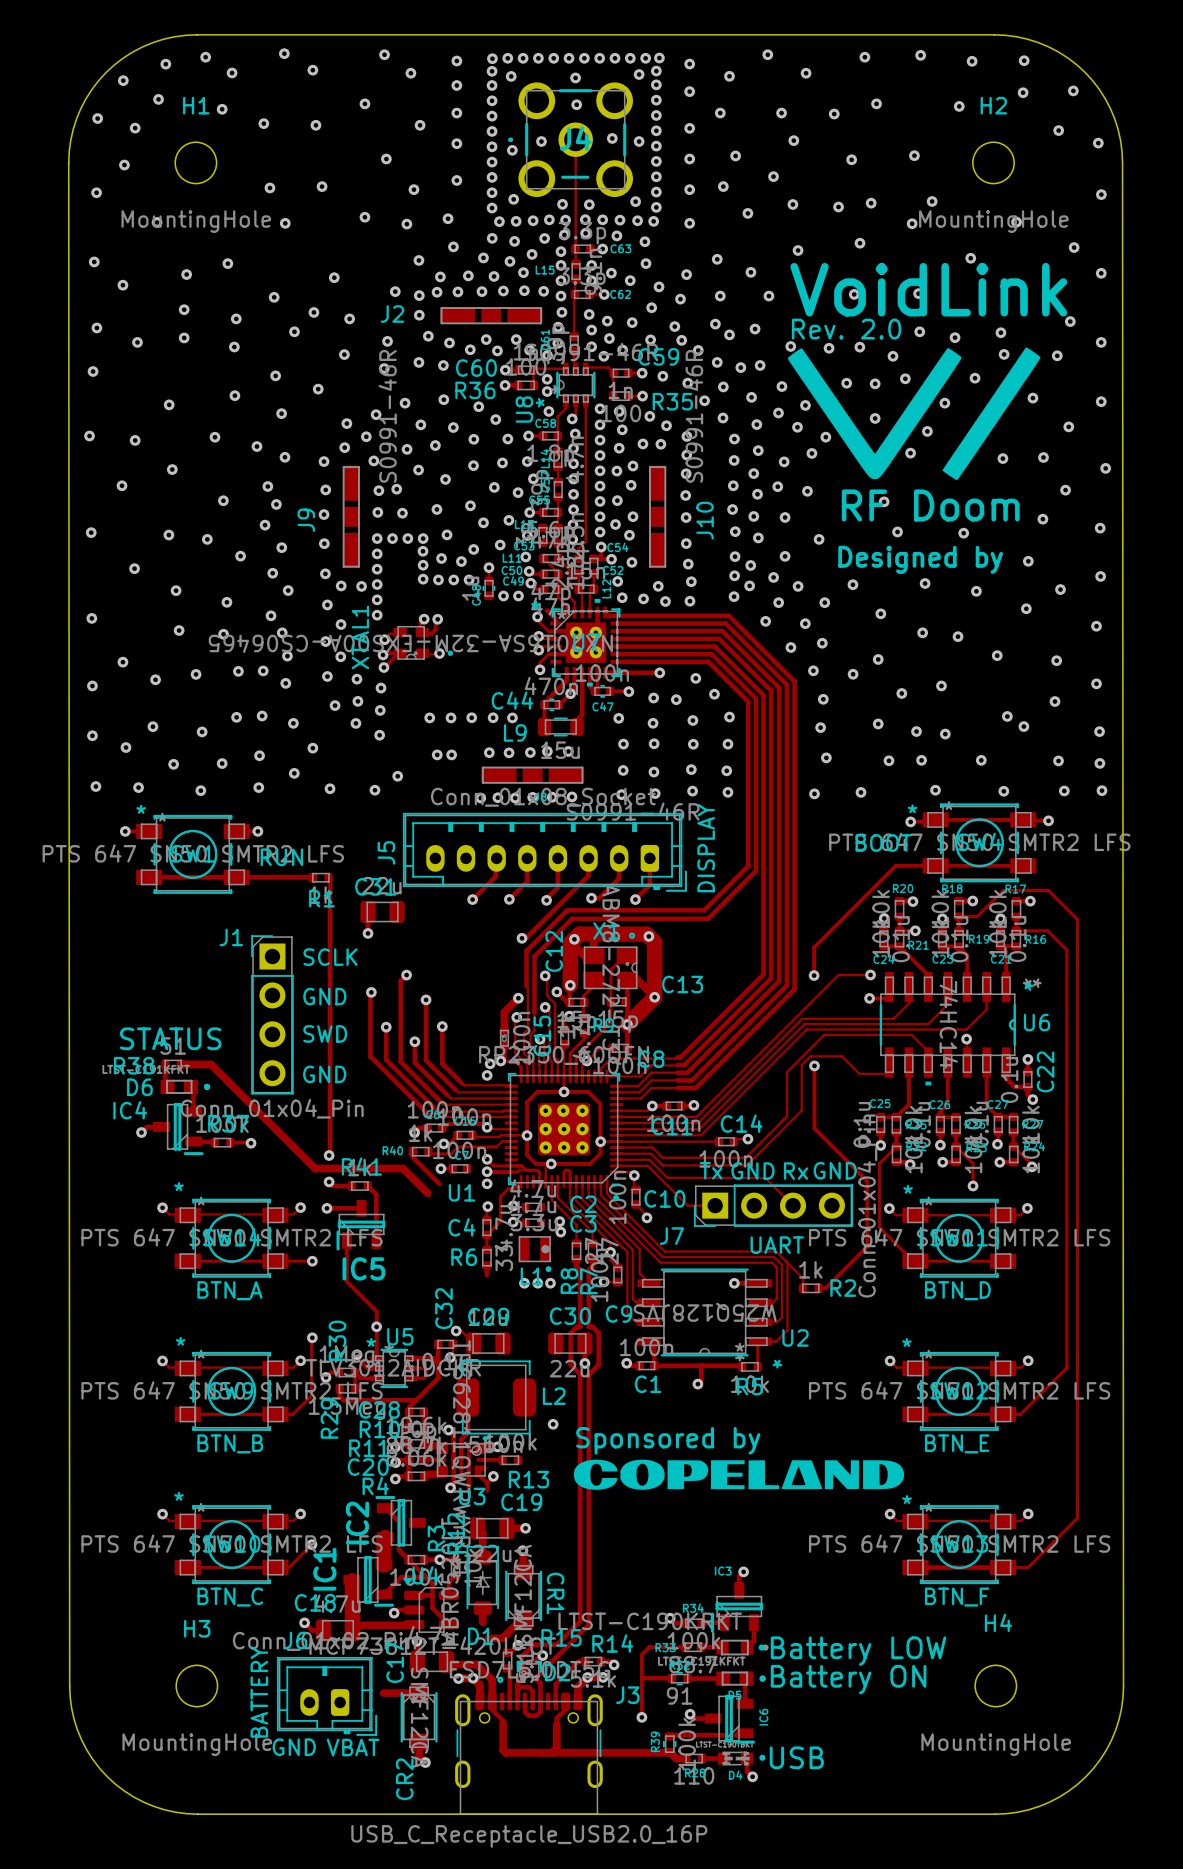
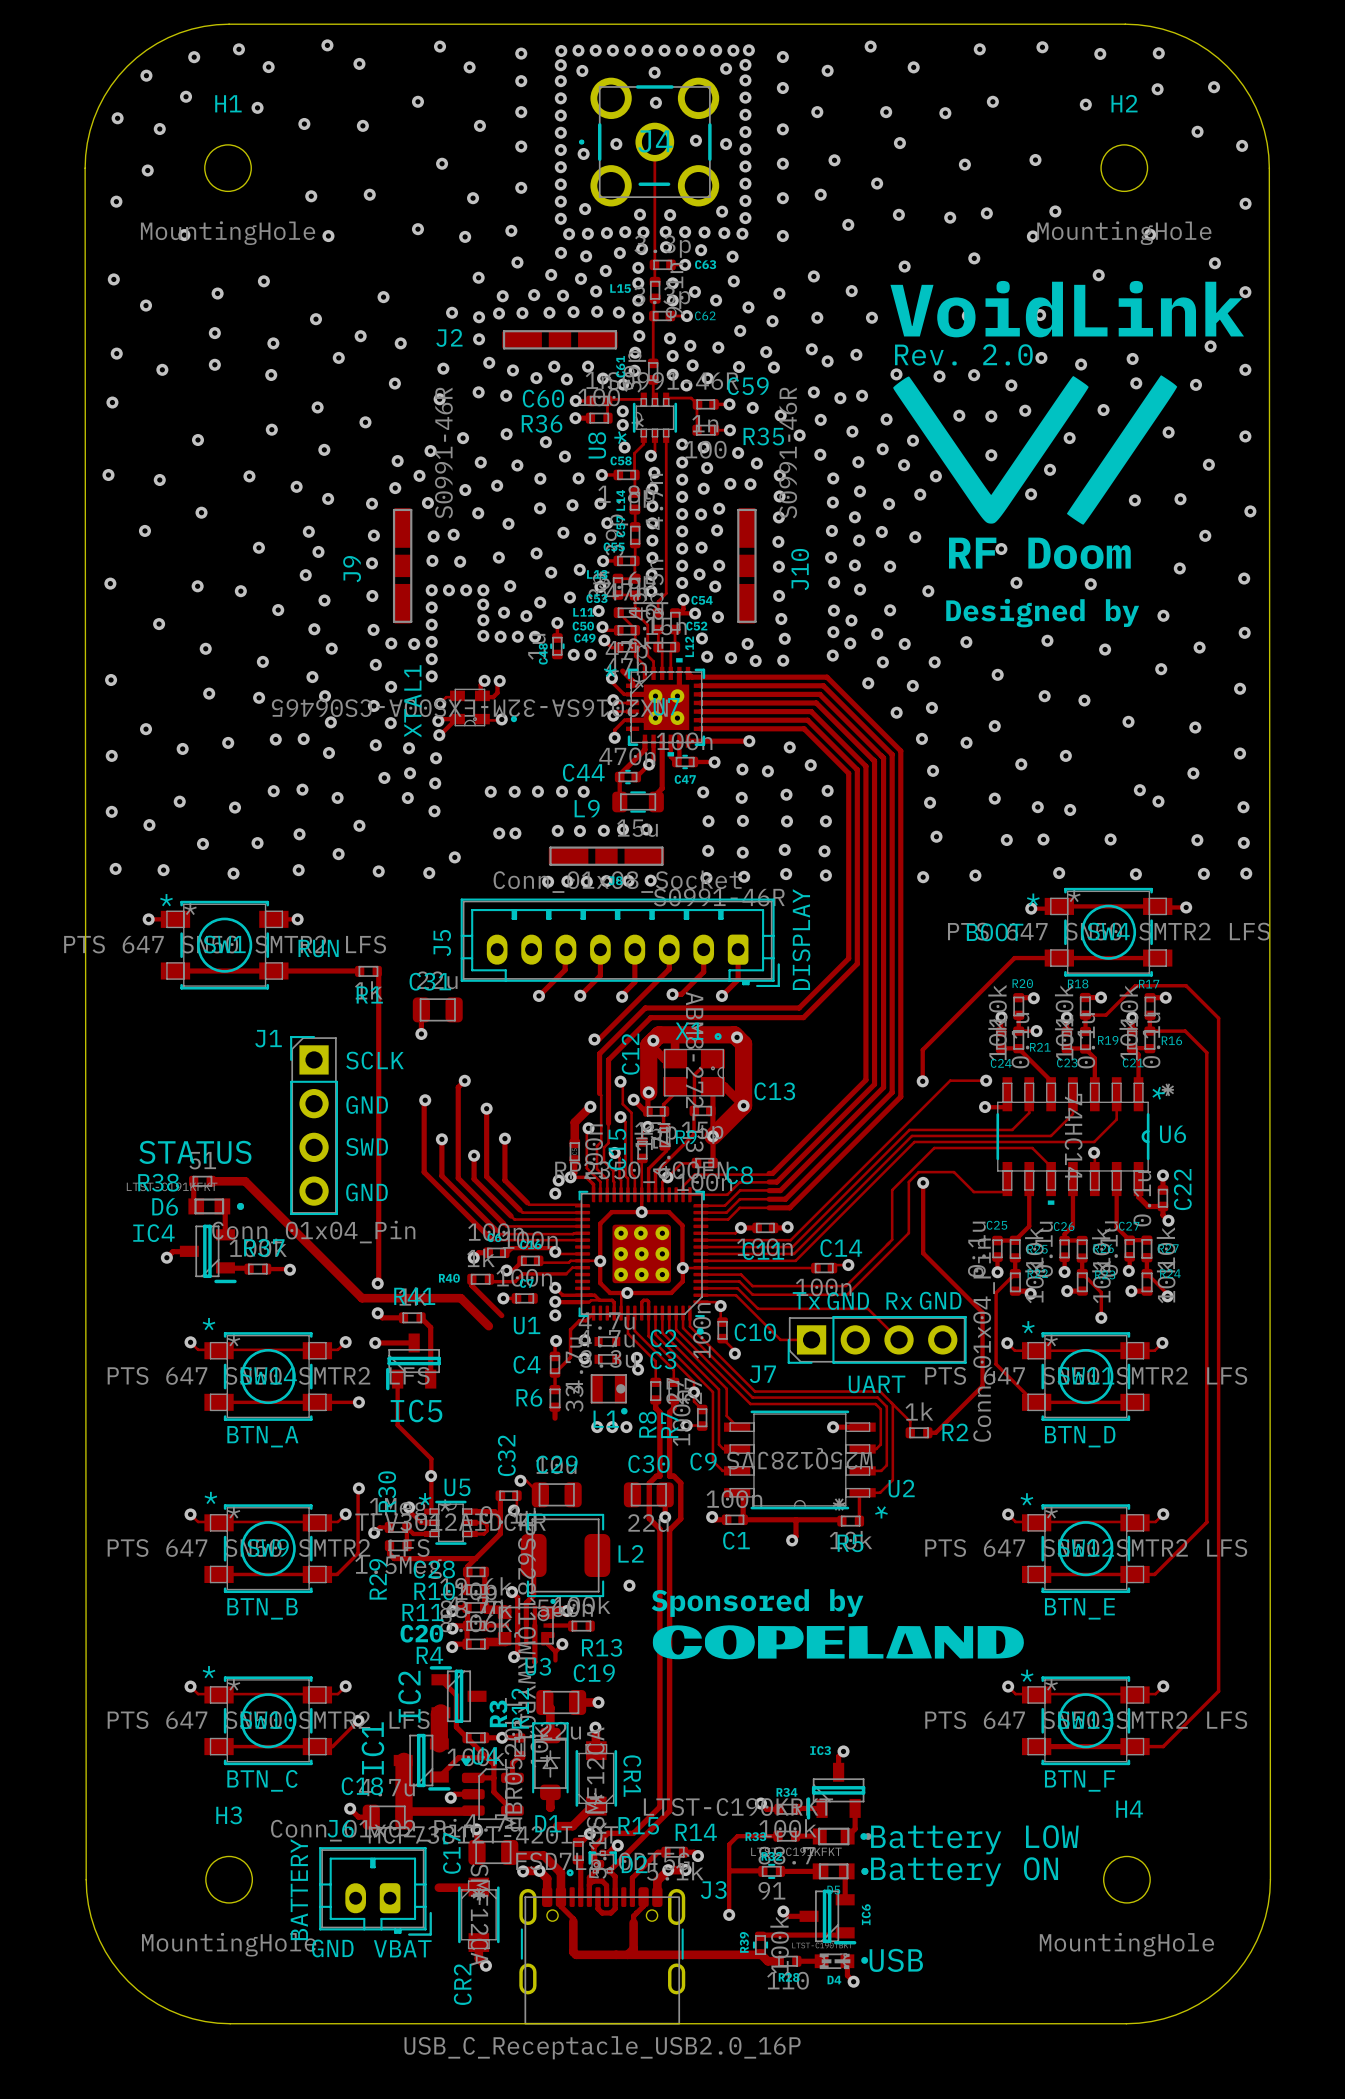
via: (698, 350) -> none

